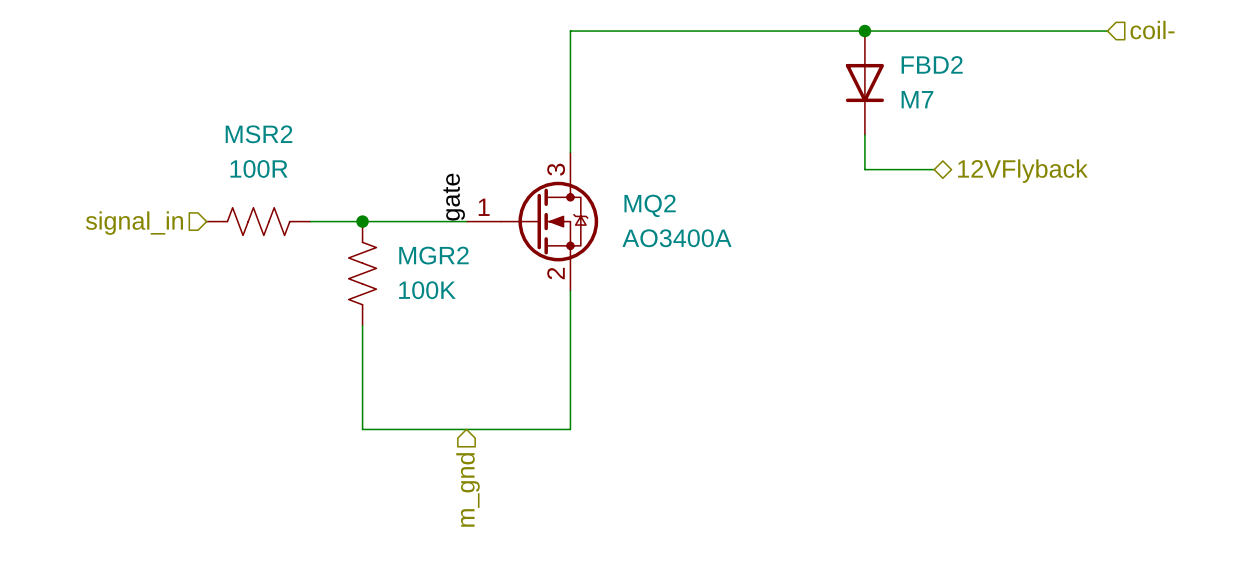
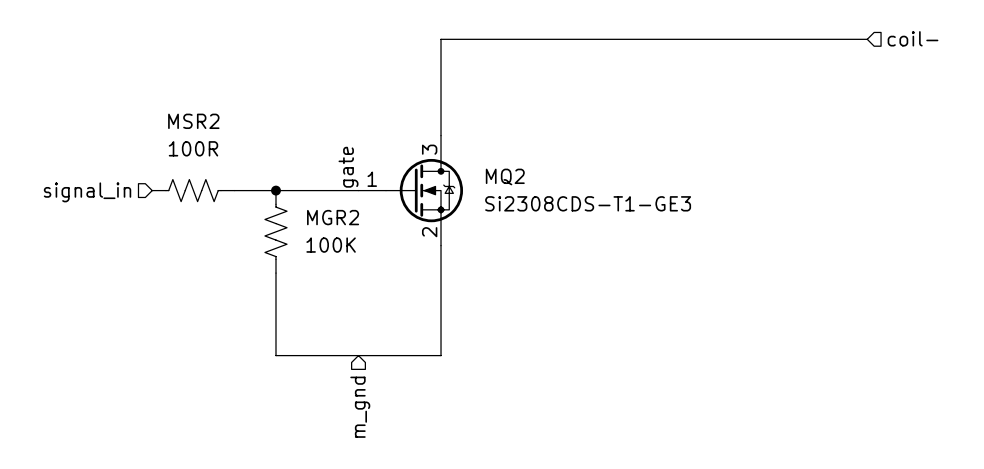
junction: (864, 31) -> none
FBD2: M7 (864, 83) -> none
wire: (864, 134) (864, 169) (934, 169) -> none
hierarchical label: 12VFlyback (1022, 171) -> none
MQ2 value: AO3400A (677, 238) -> Si2308CDS-T1-GE3 (588, 203)

